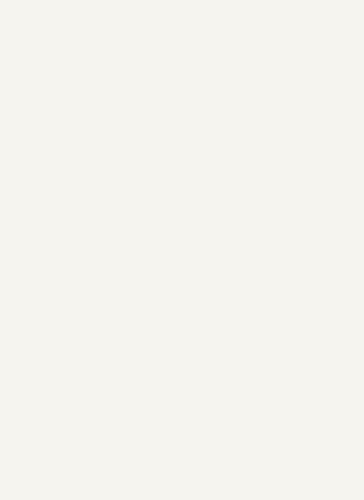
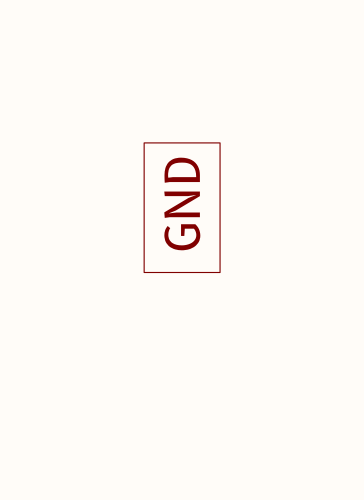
global label: none -> GND (182, 203)

